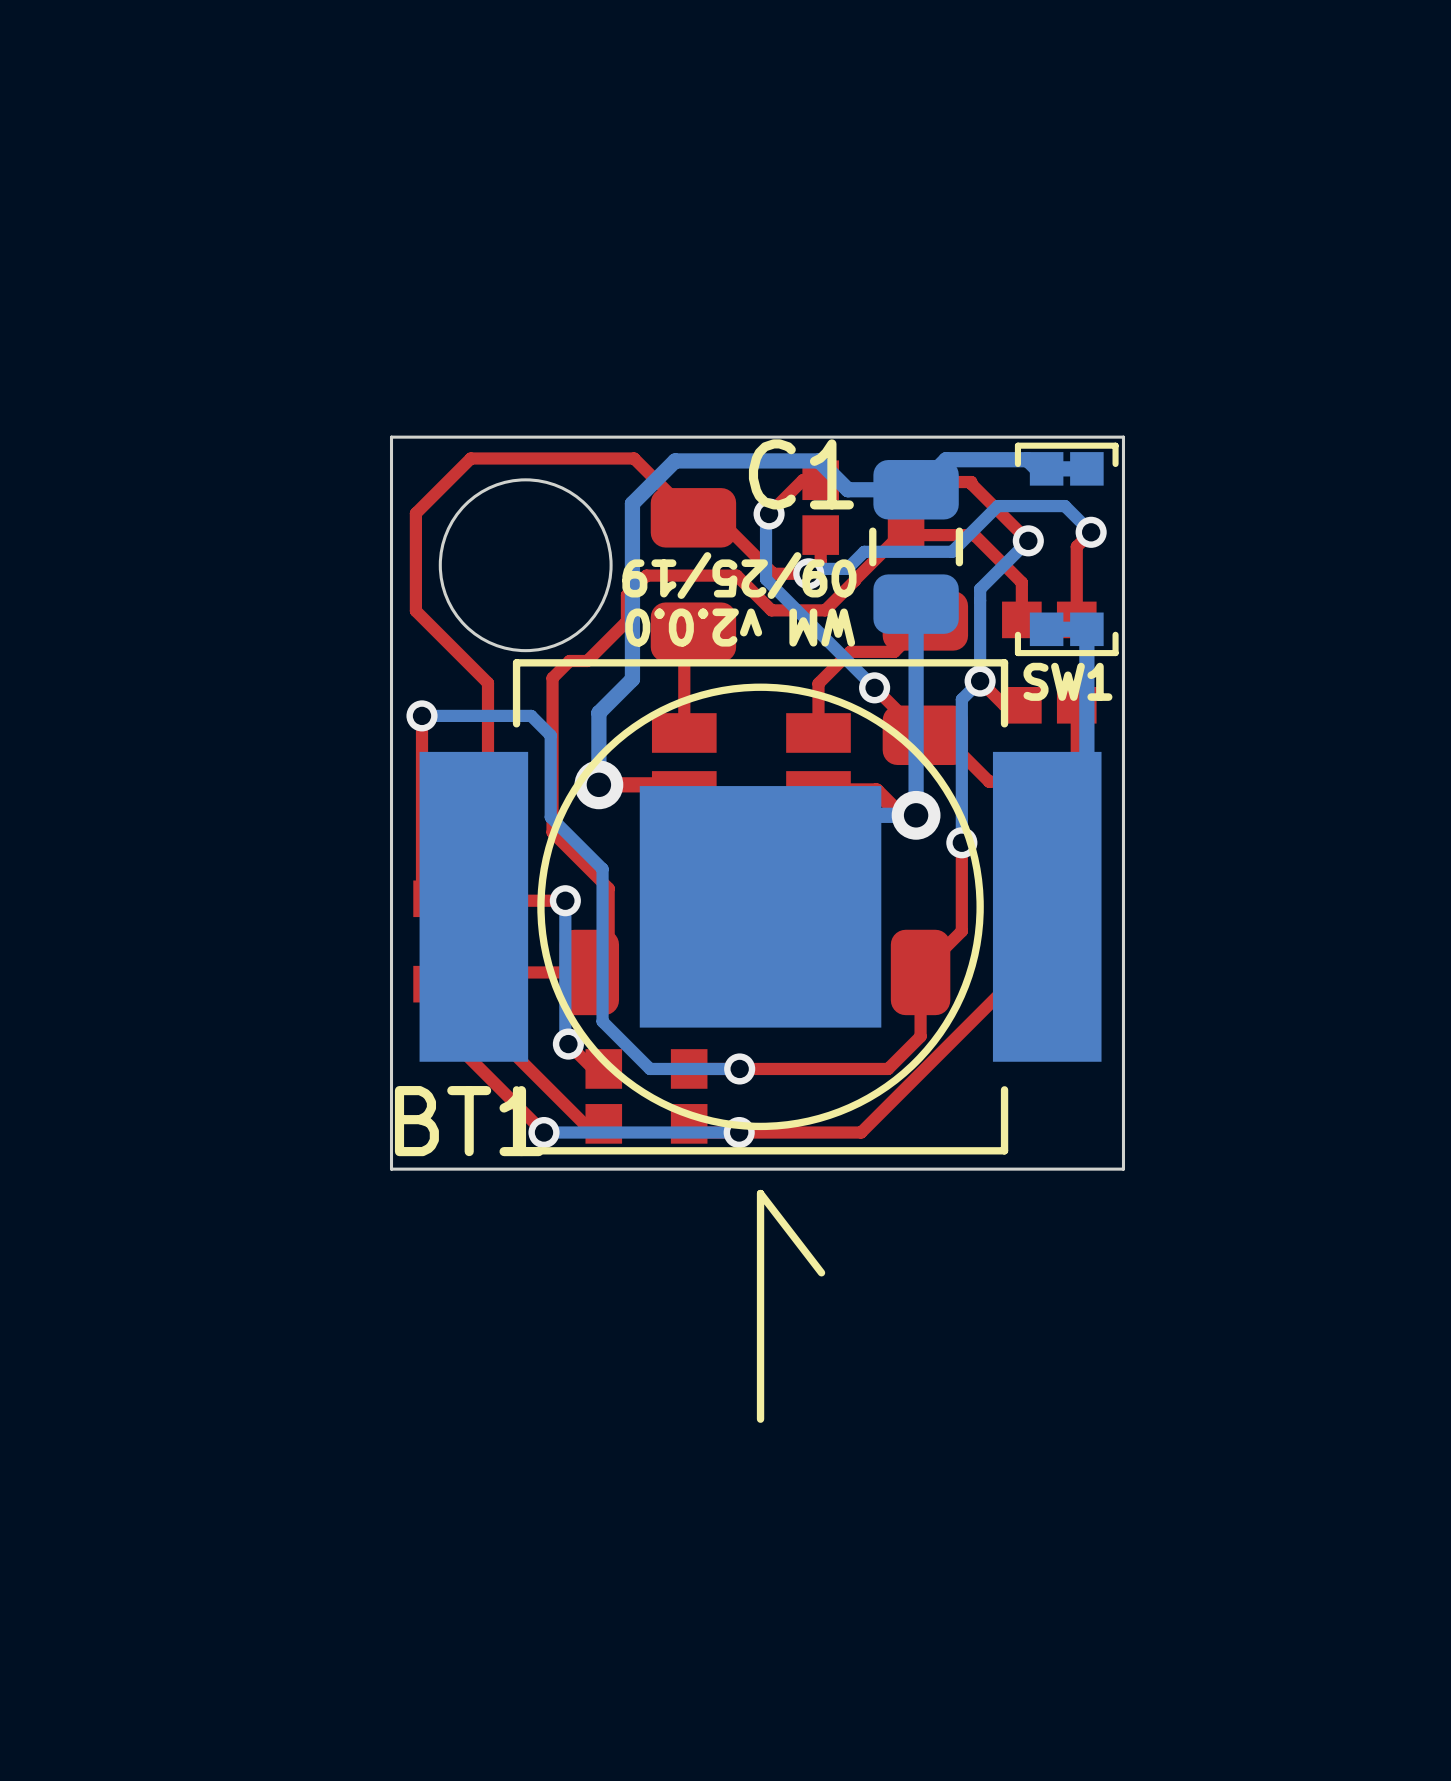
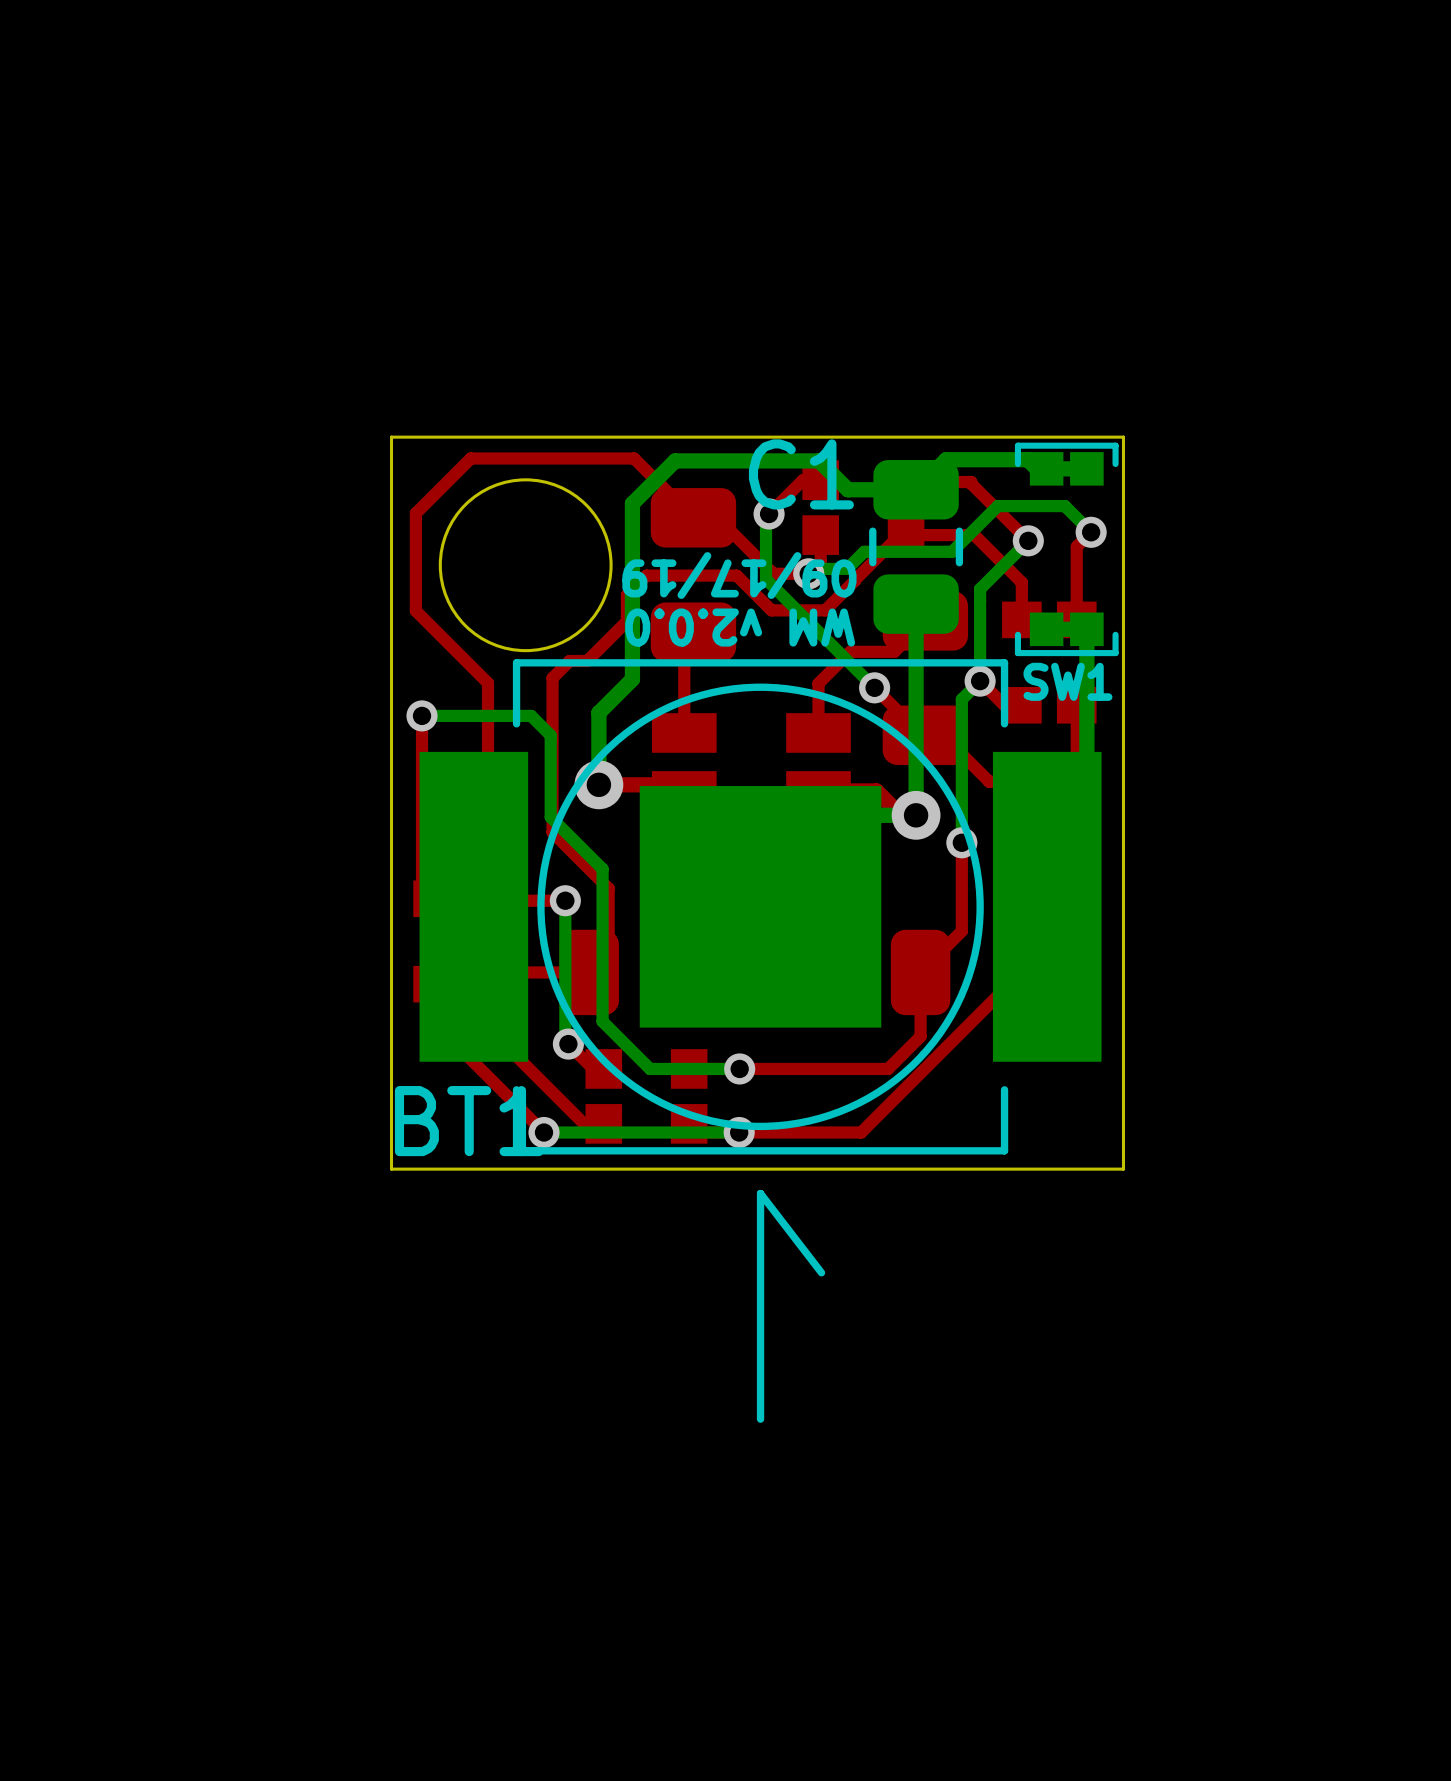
text: 09/25/19 (739, 575) -> 09/17/19 (739, 575)

